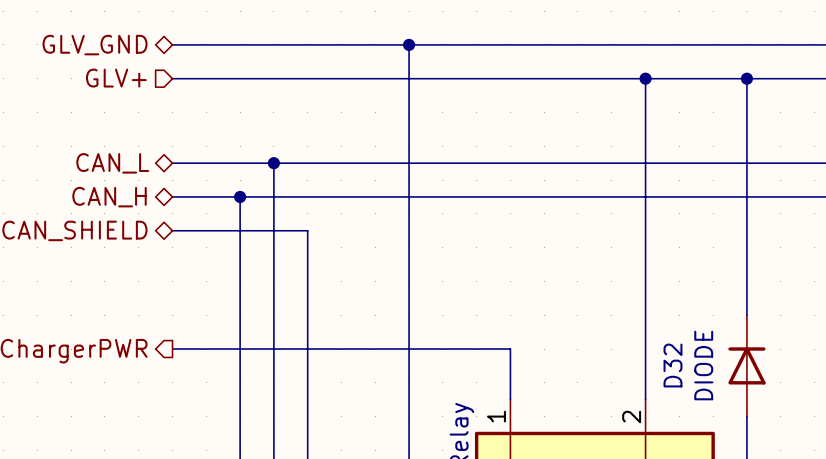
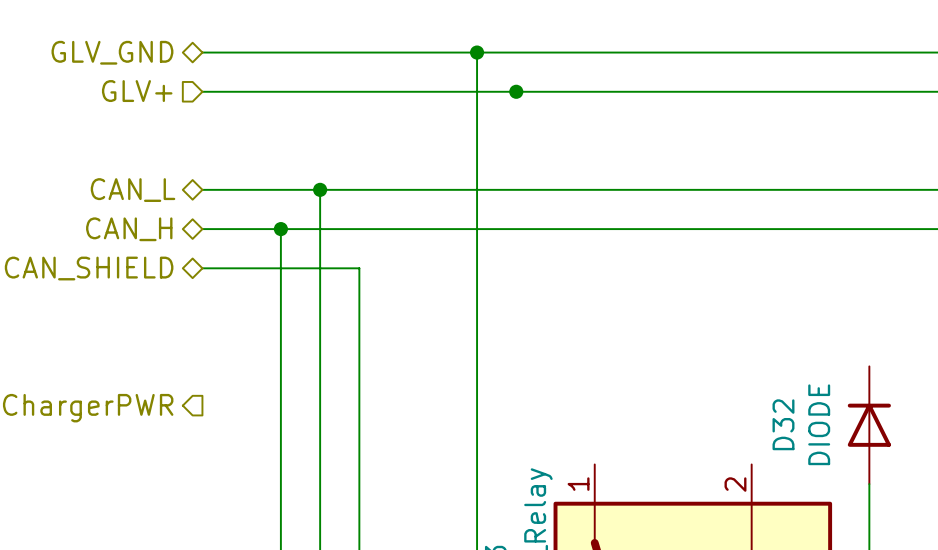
junction: none -> (516, 91)
wire: (645, 78) (645, 399) -> none
junction: (645, 78) -> none
wire: (746, 78) (746, 315) -> none
junction: (746, 78) -> none
wire: (172, 349) (510, 349) (510, 399) -> none

